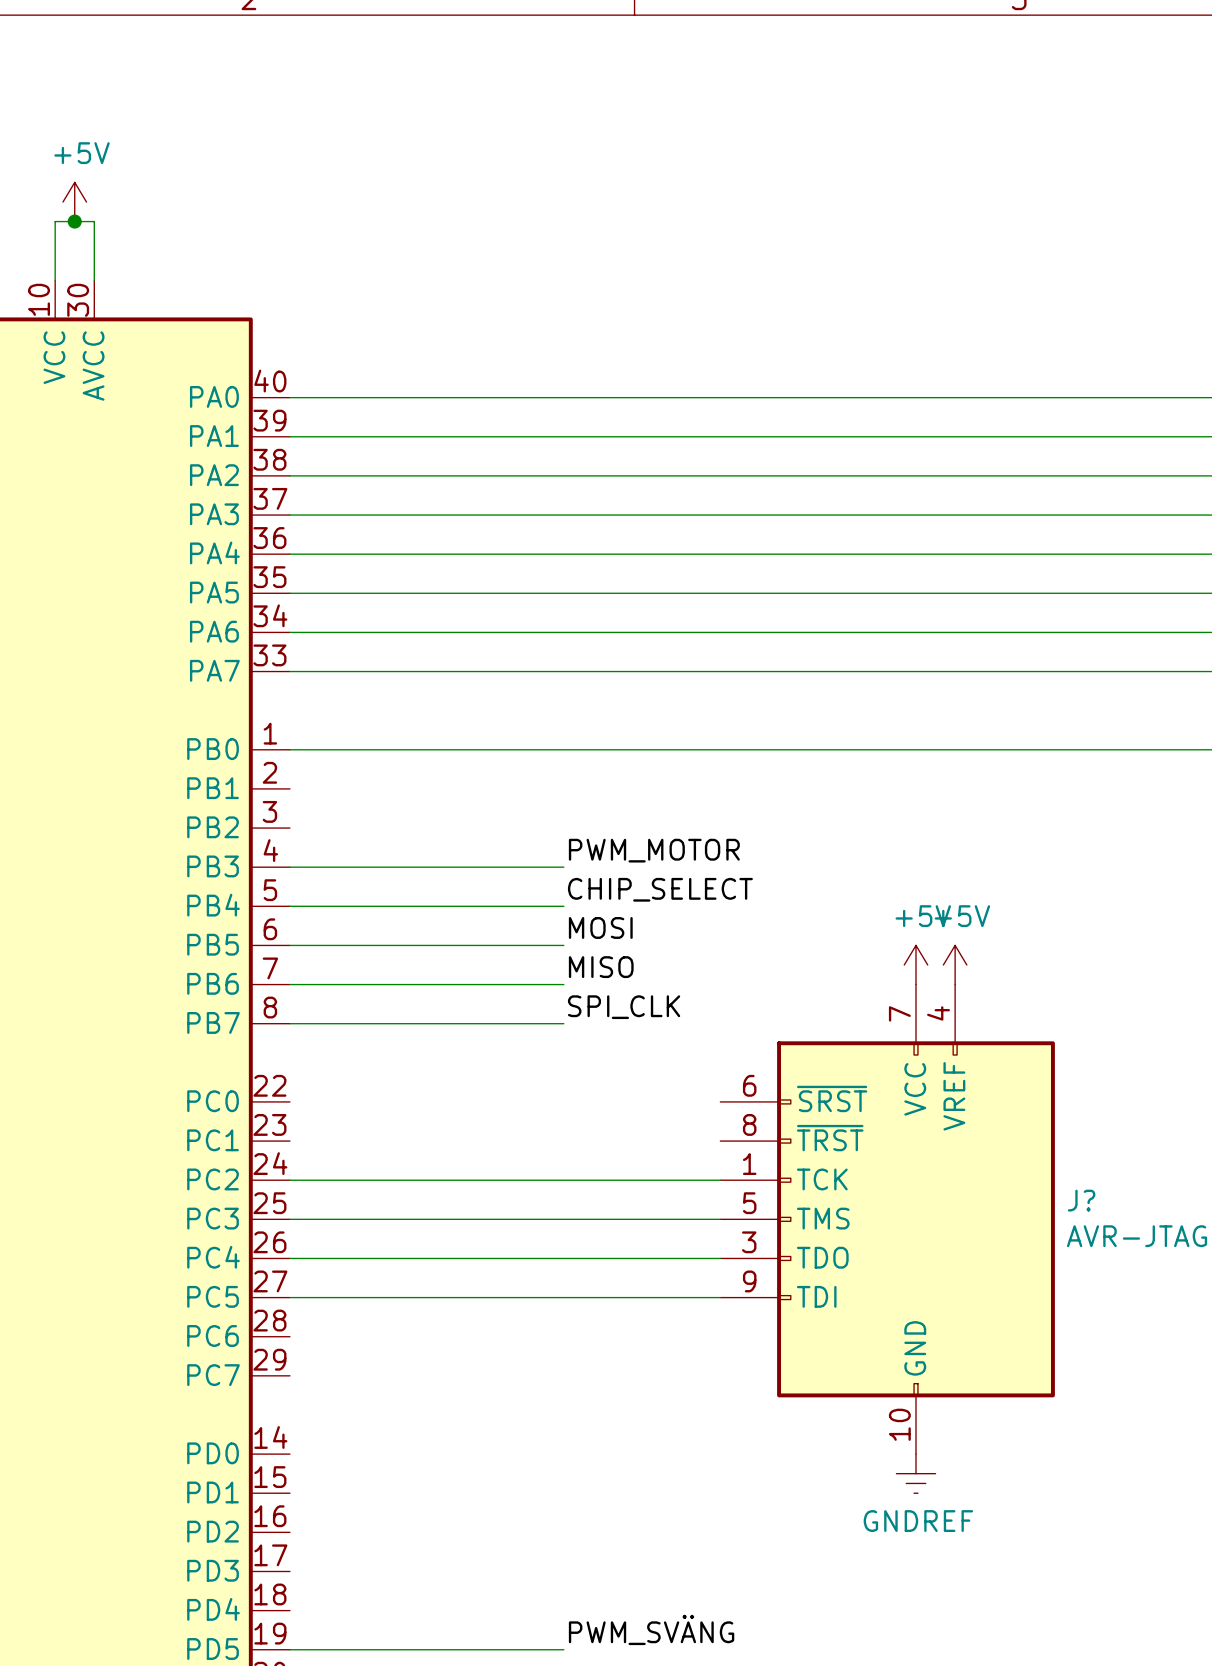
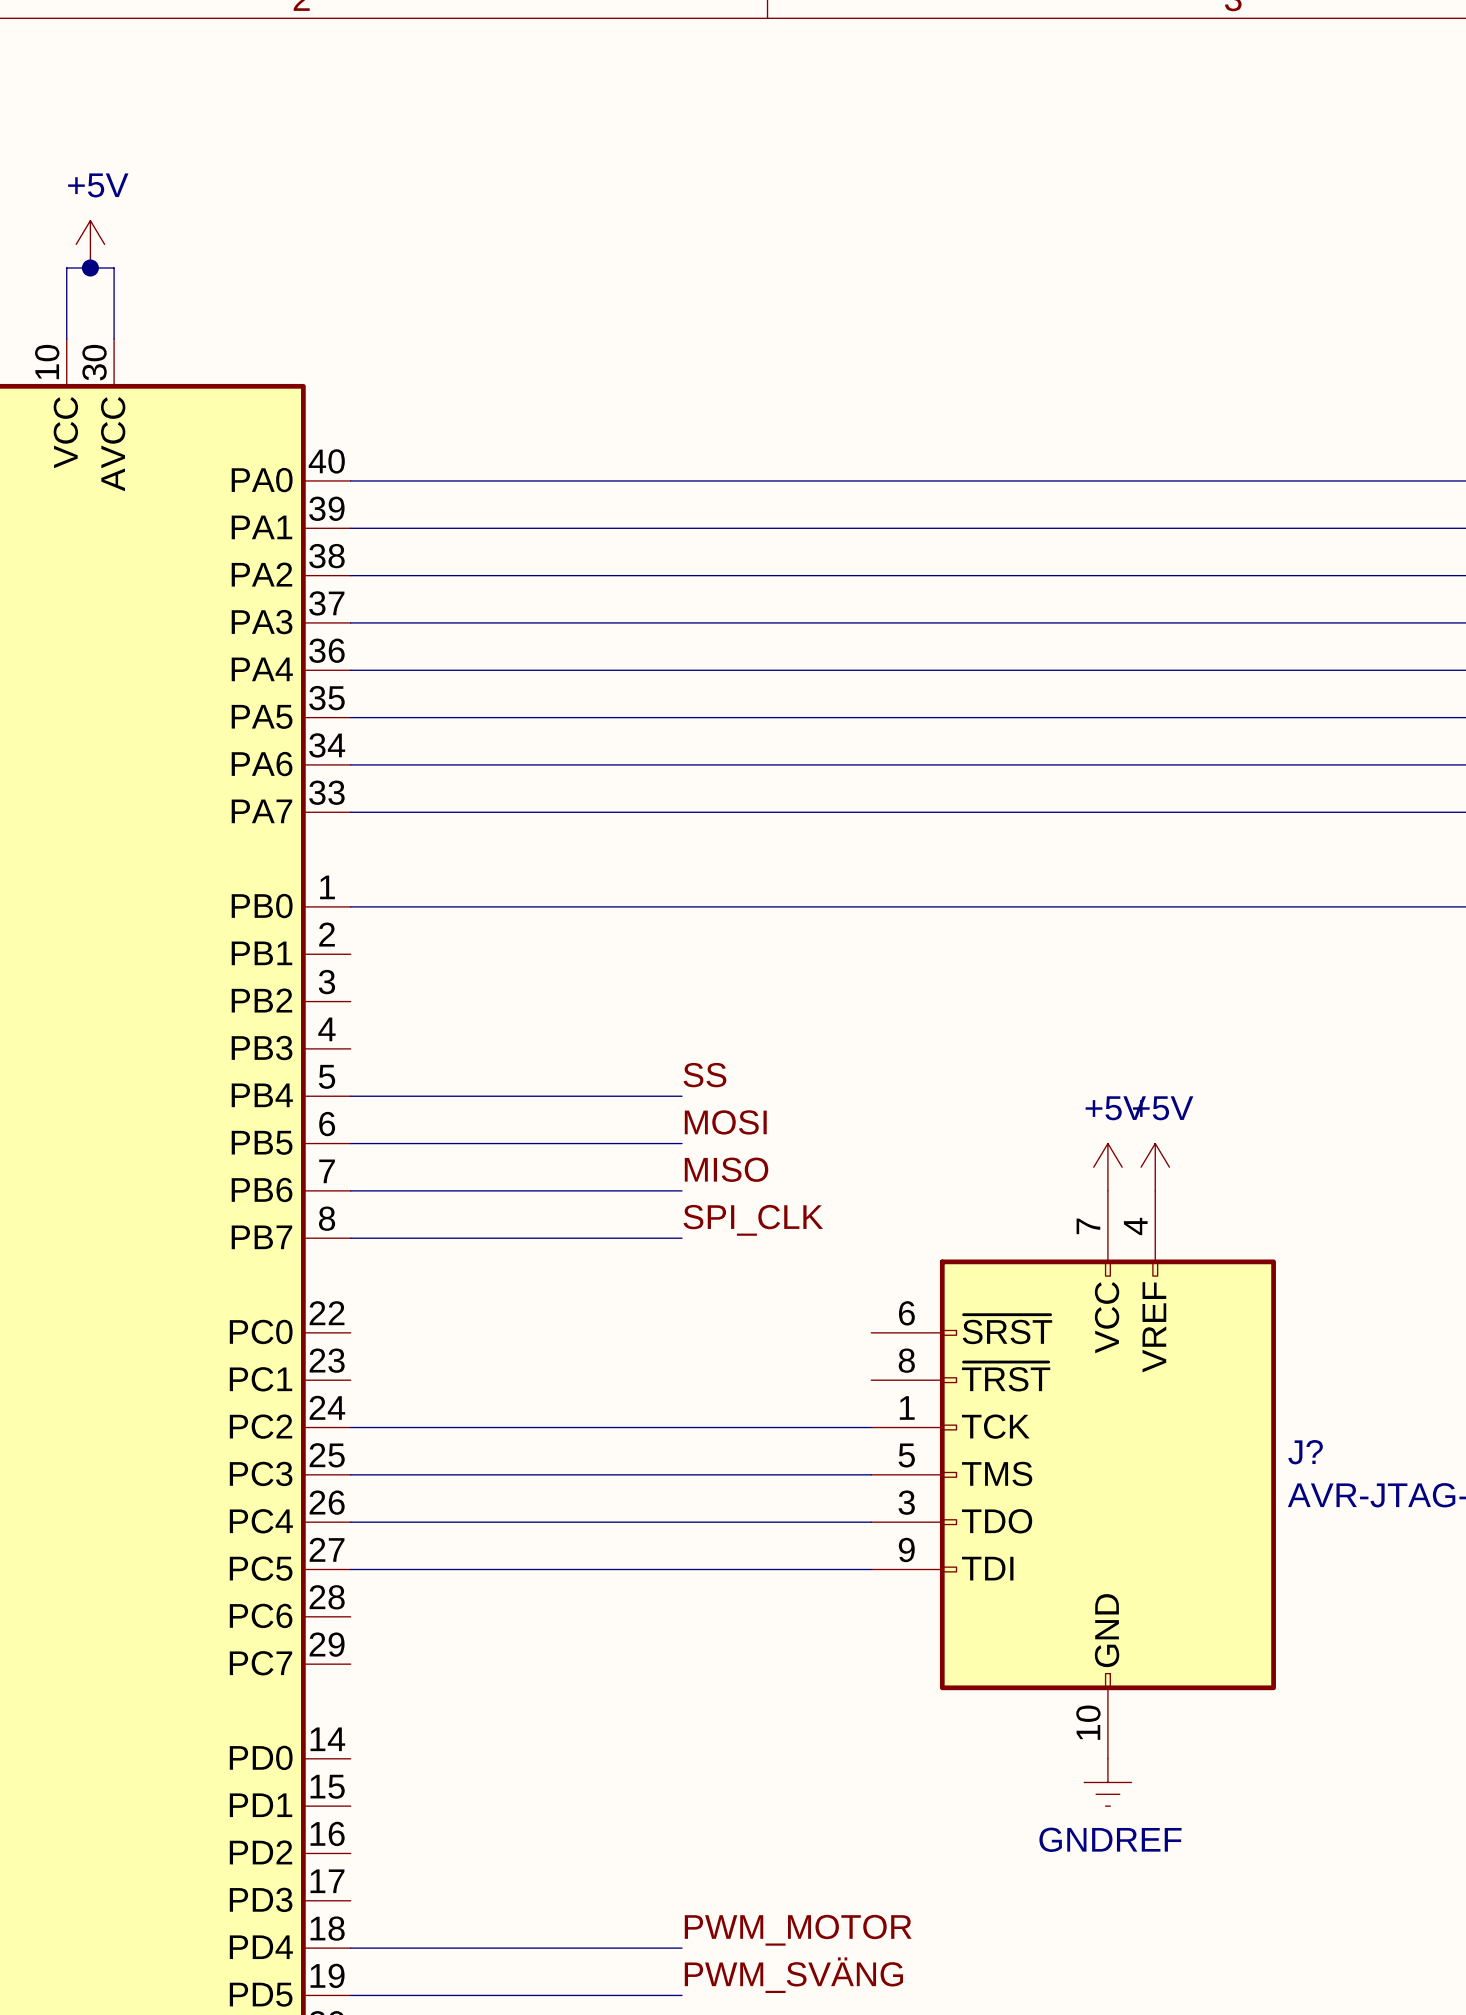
label: PWM_MOTOR (654, 850) -> none
wire: (289, 867) (563, 867) -> none
label: CHIP_SELECT (660, 889) -> SS (704, 1075)
label: none -> PWM_MOTOR (798, 1930)
wire: none -> (350, 1948) (681, 1948)

